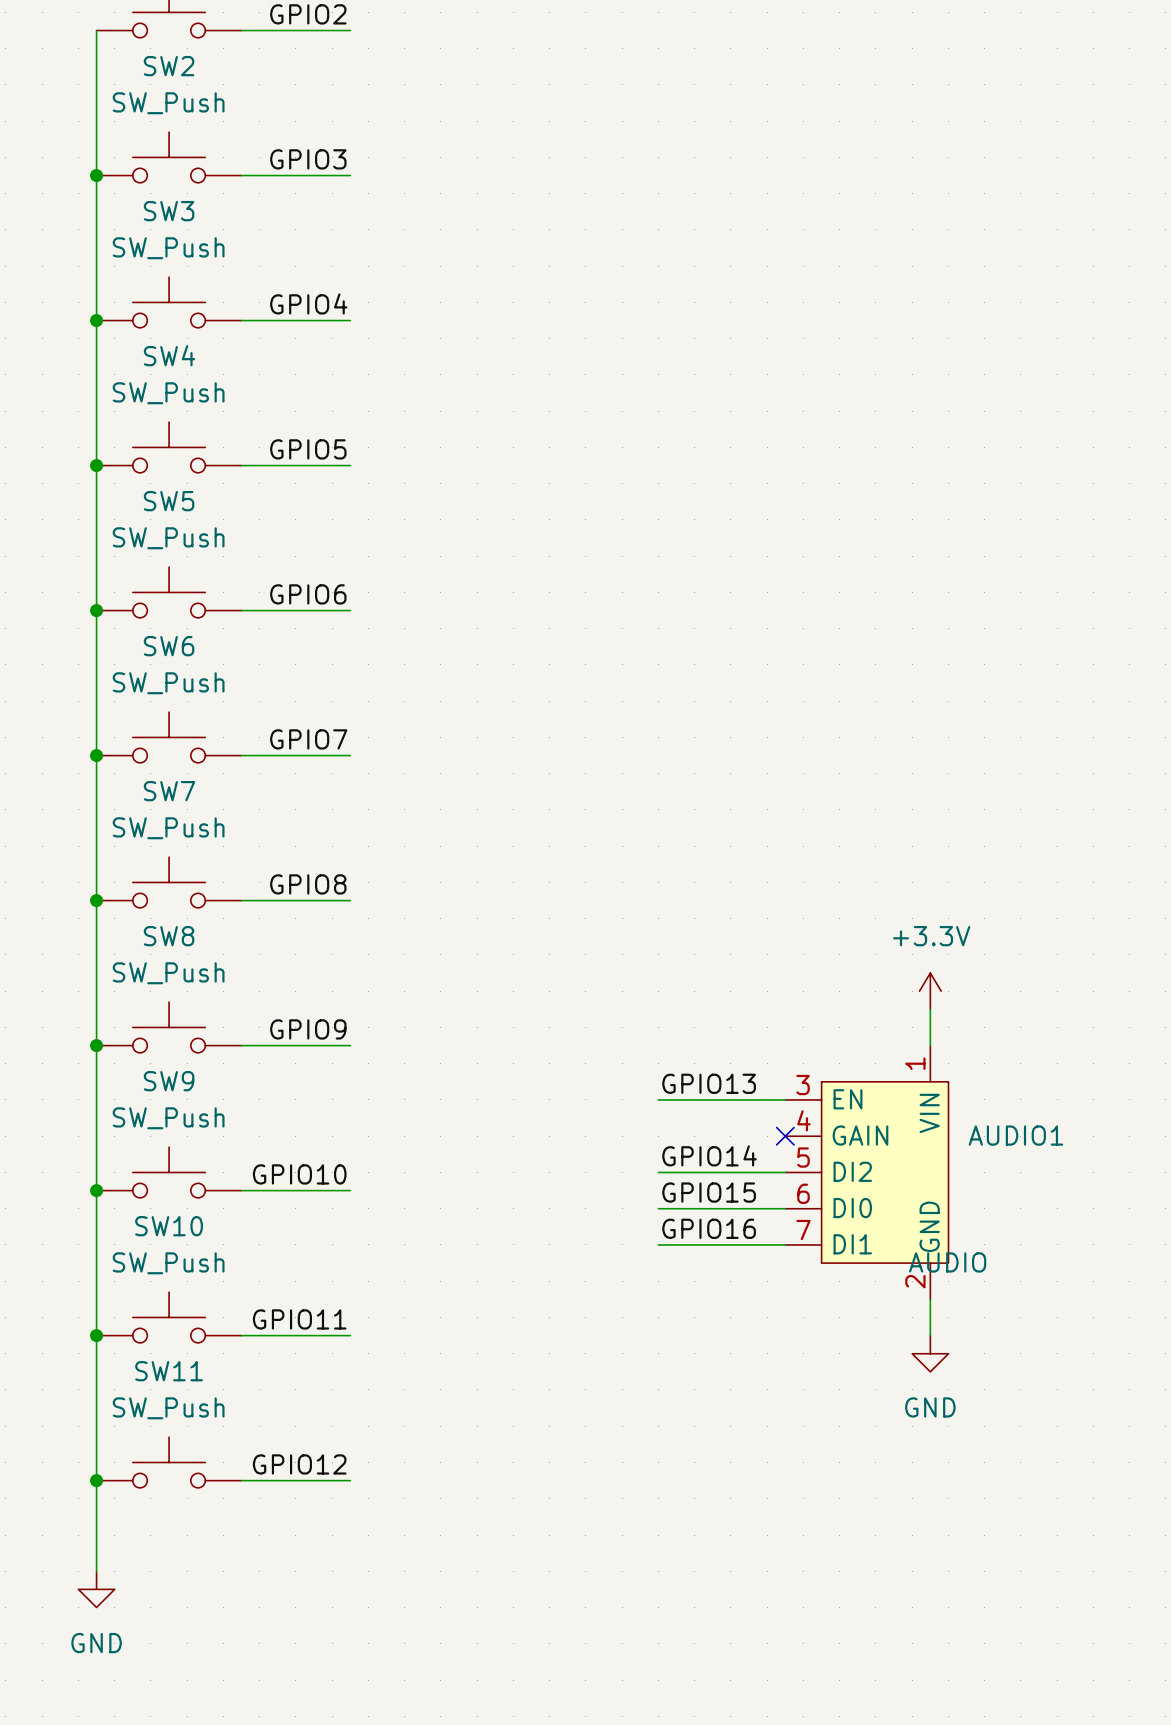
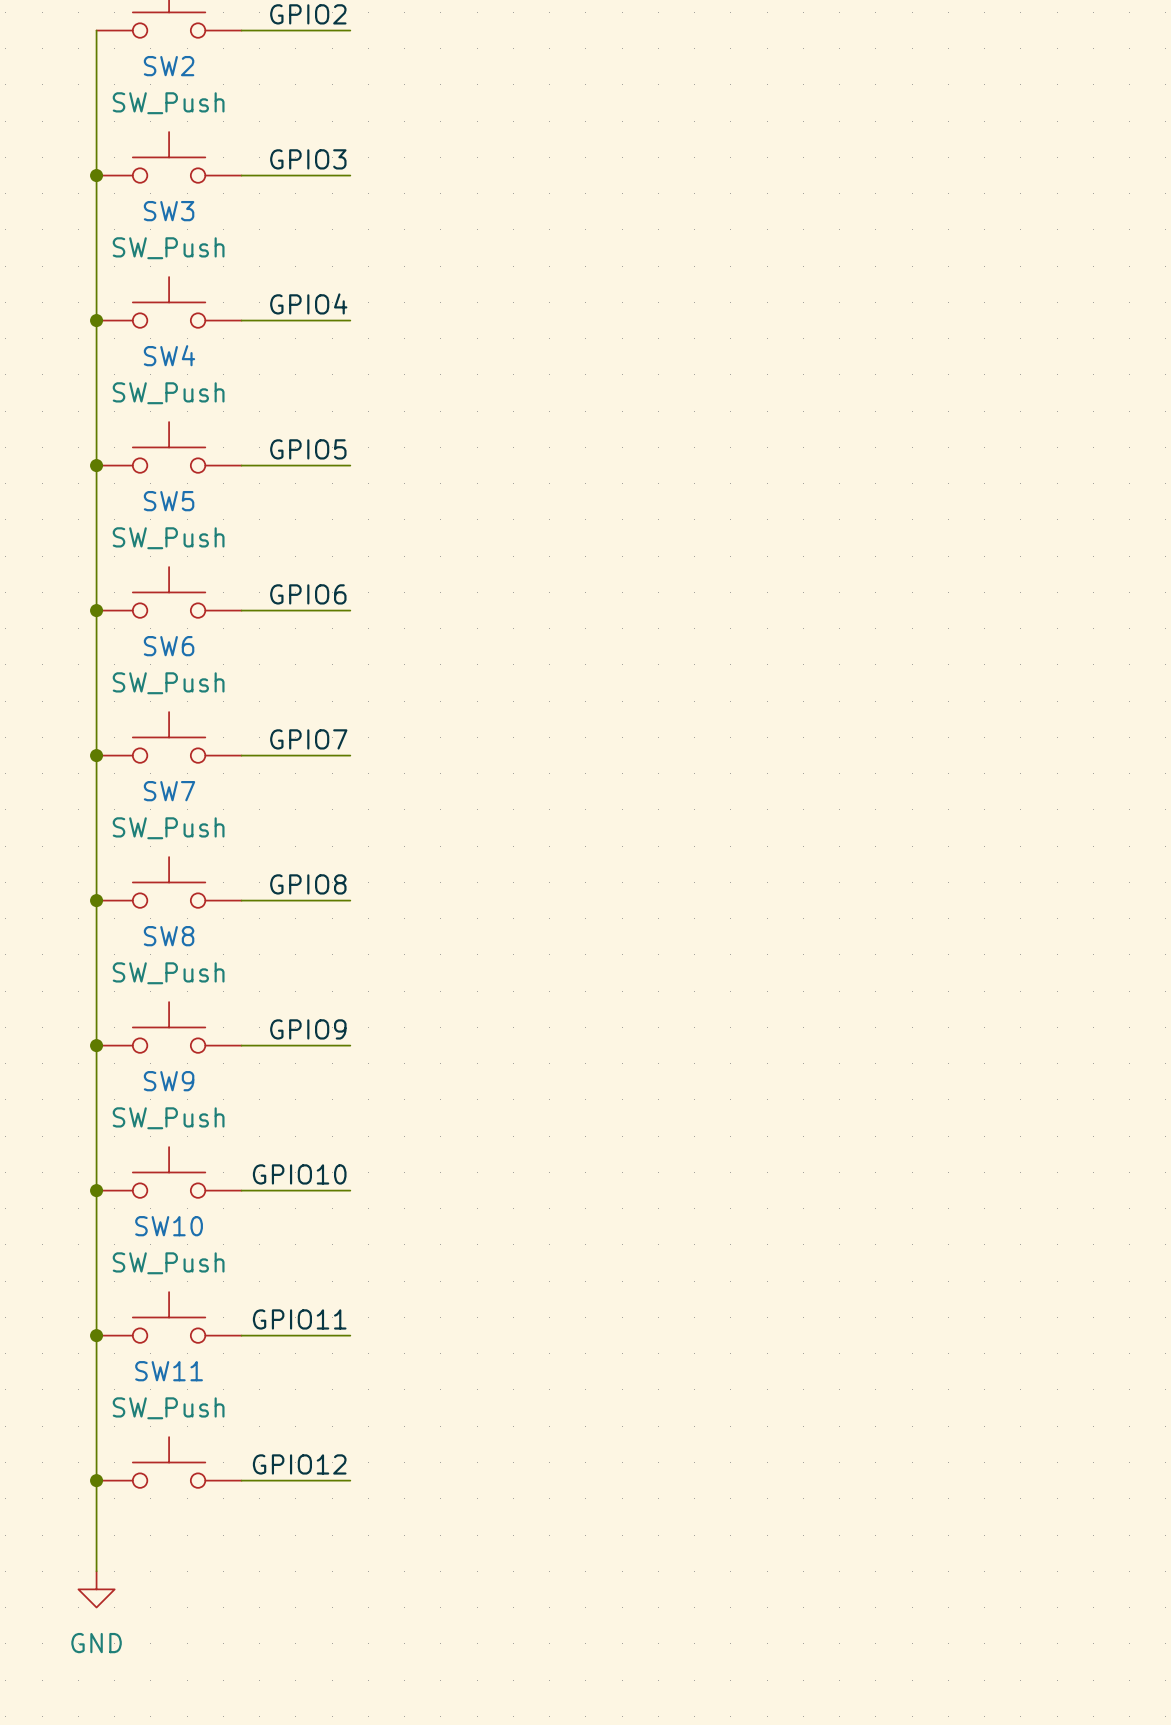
power symbol: +3.3V (930, 991) -> none
wire: (930, 1009) (930, 1045) -> none
label: GPIO13 (709, 1083) -> none
wire: (658, 1099) (785, 1099) -> none
no-connect mark: (785, 1136) -> none
label: GPIO14 (709, 1155) -> none
wire: (658, 1172) (785, 1172) -> none
AUDIO1: AUDIO (866, 1172) -> none
label: GPIO15 (709, 1192) -> none
wire: (658, 1208) (785, 1208) -> none
label: GPIO16 (709, 1228) -> none
wire: (658, 1244) (785, 1244) -> none
wire: (930, 1299) (930, 1335) -> none
power symbol: GND (930, 1353) -> none

